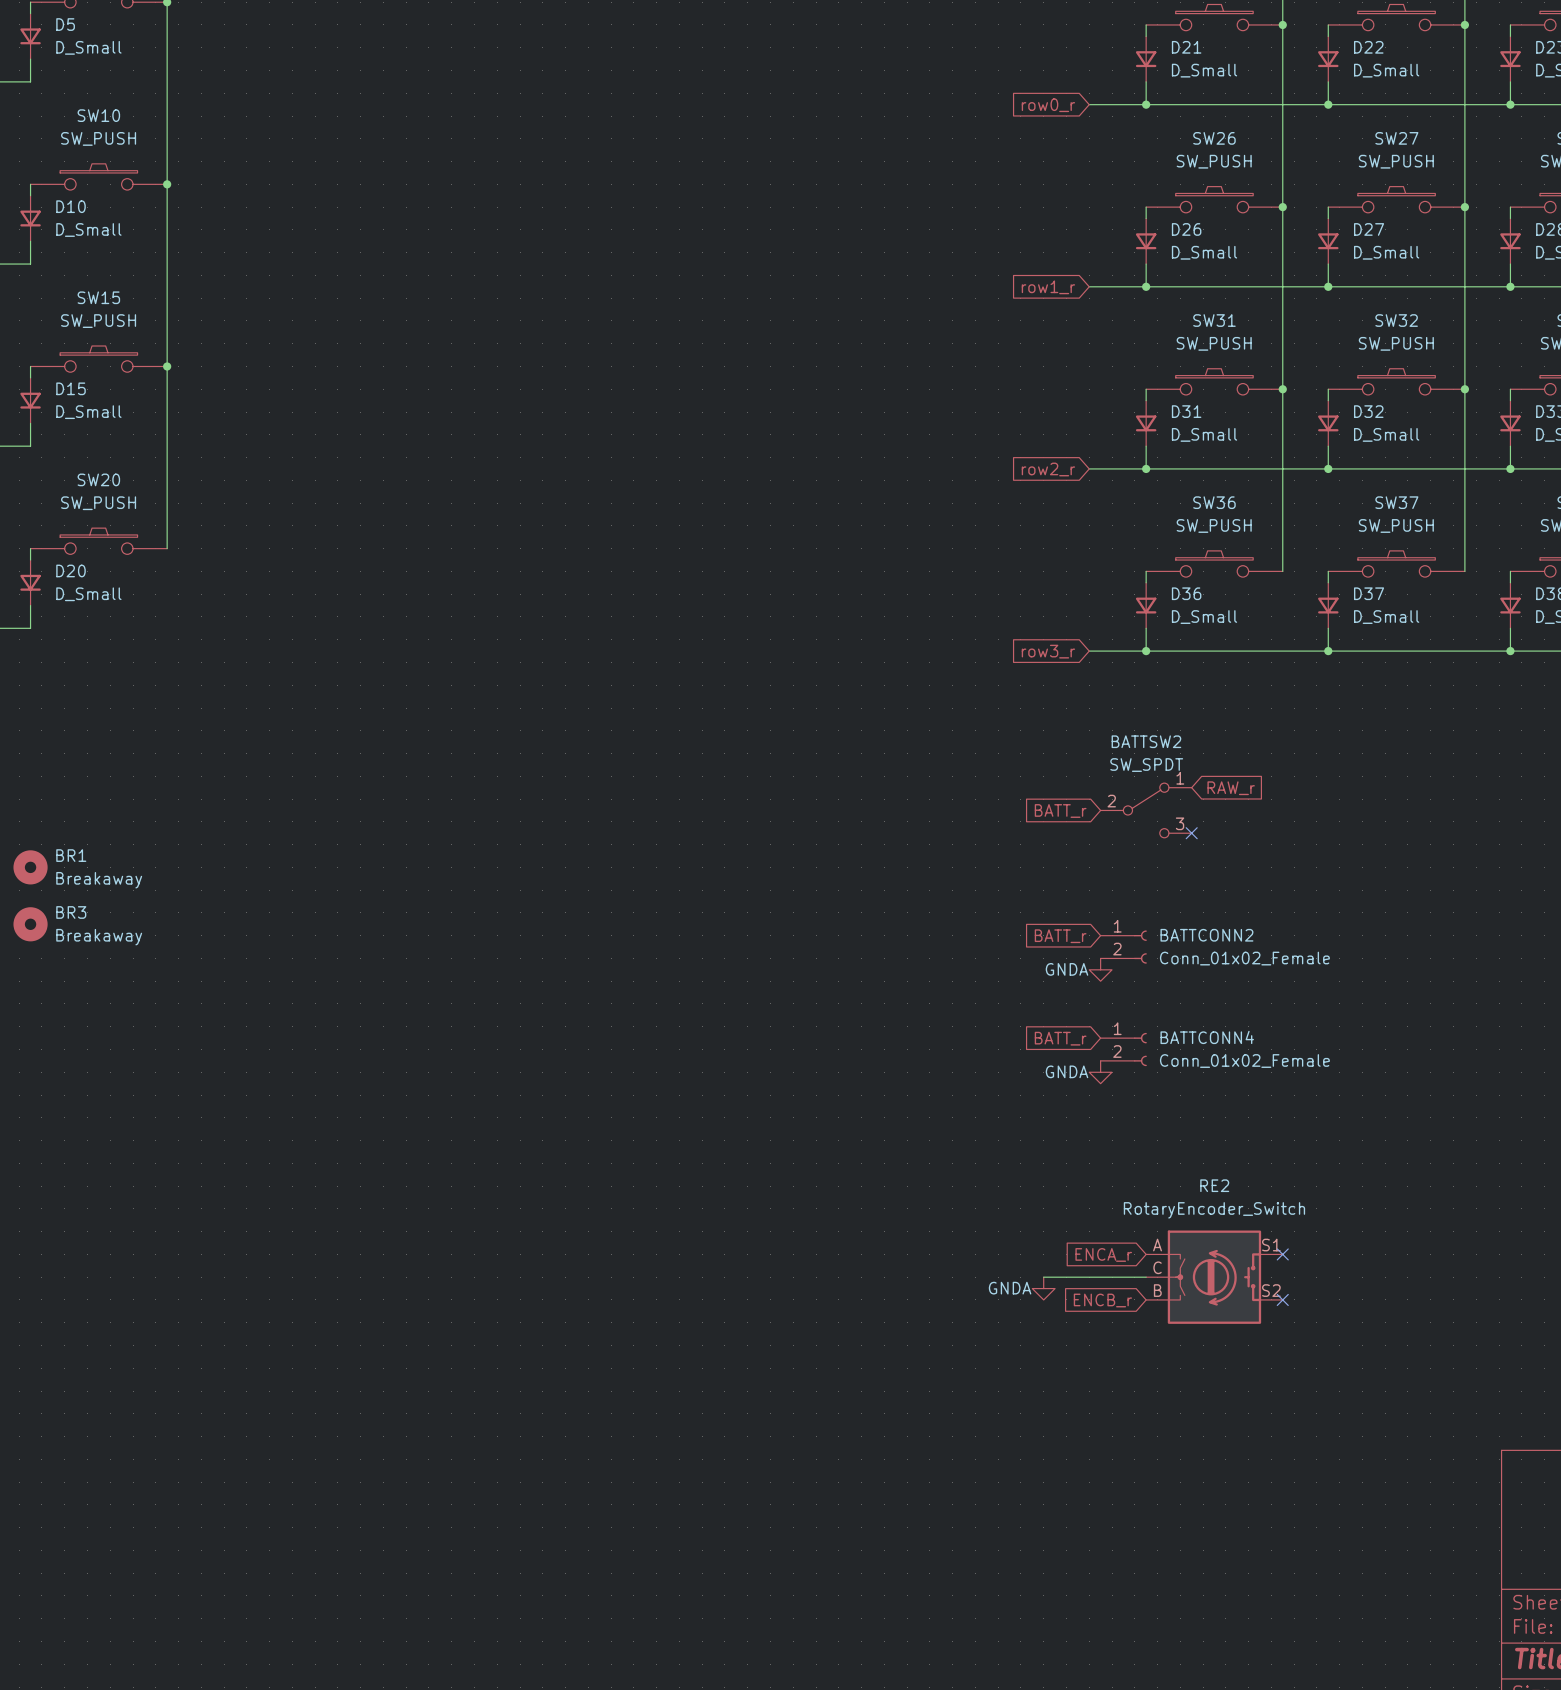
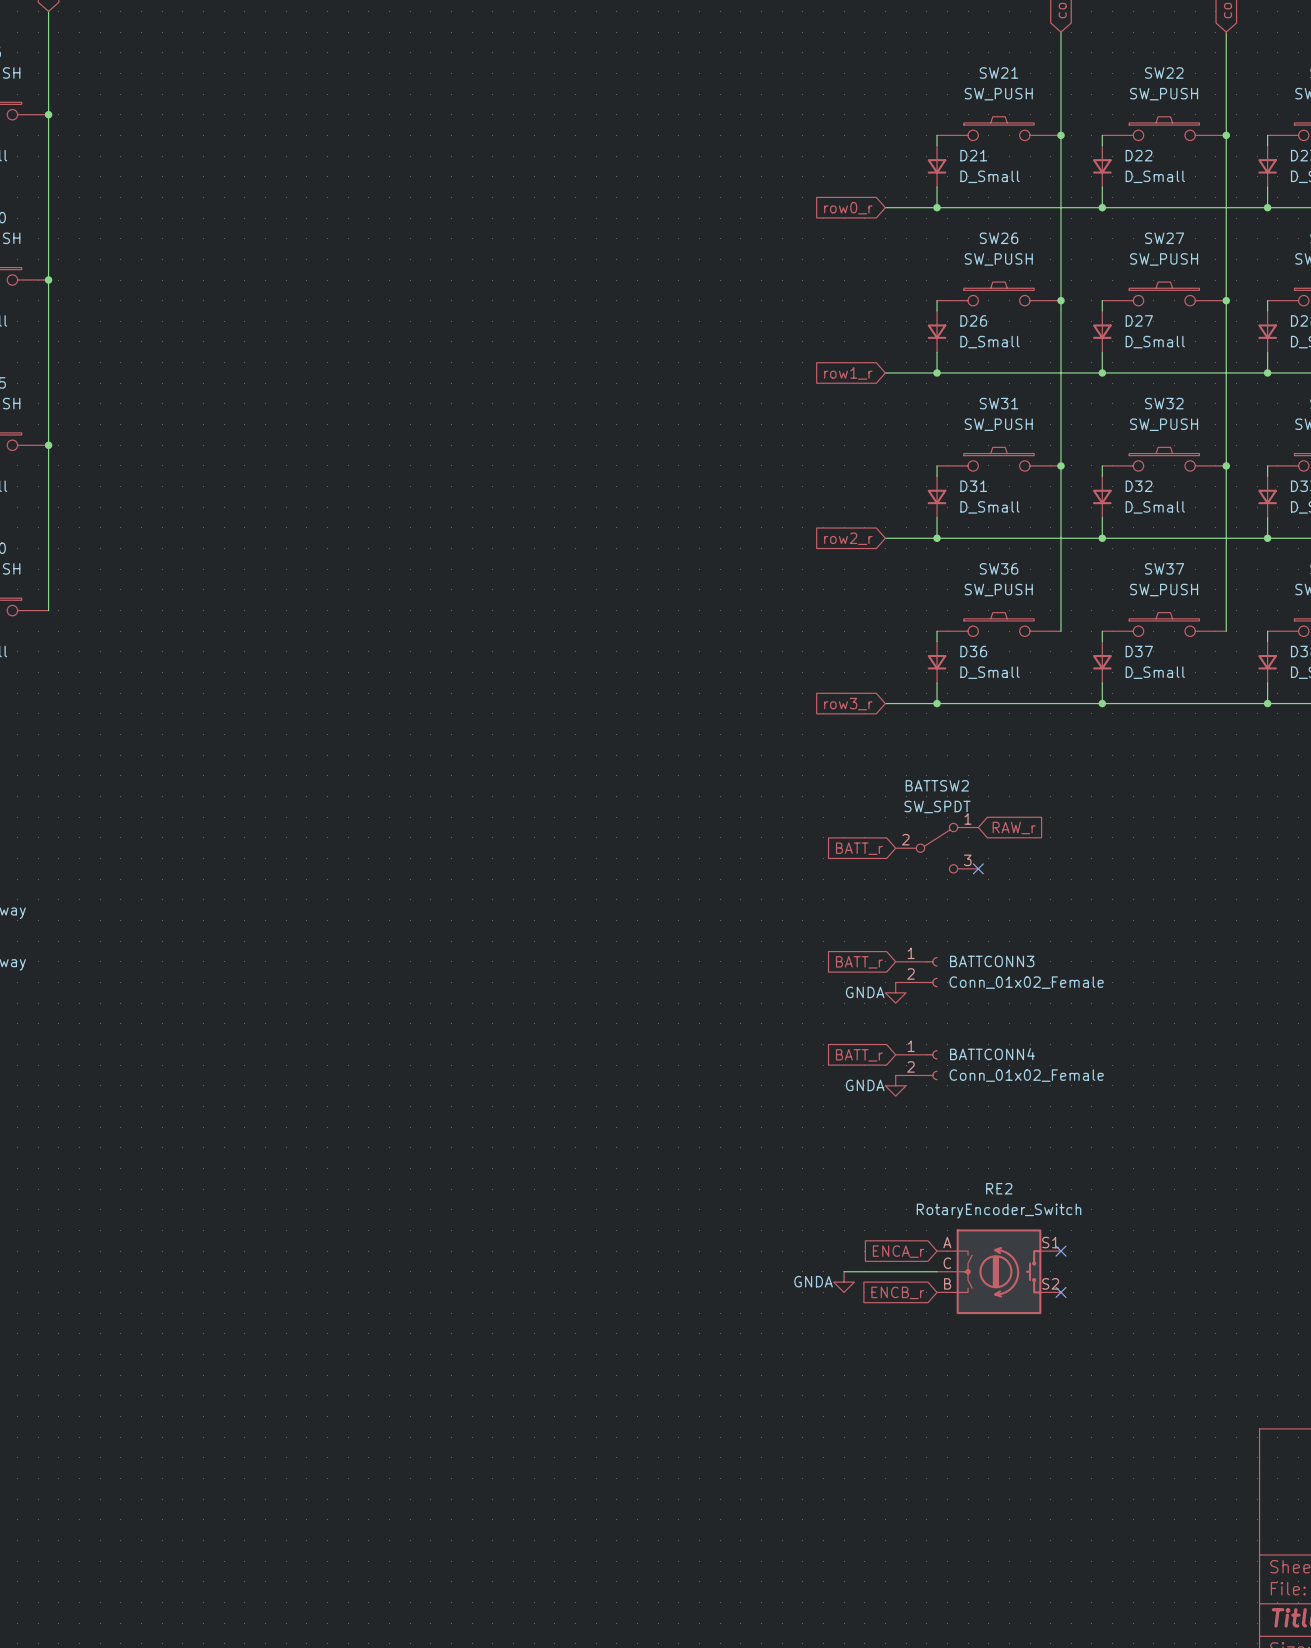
BATTCONN2 name: BATTCONN2 (1206, 935) -> BATTCONN3 (992, 961)

